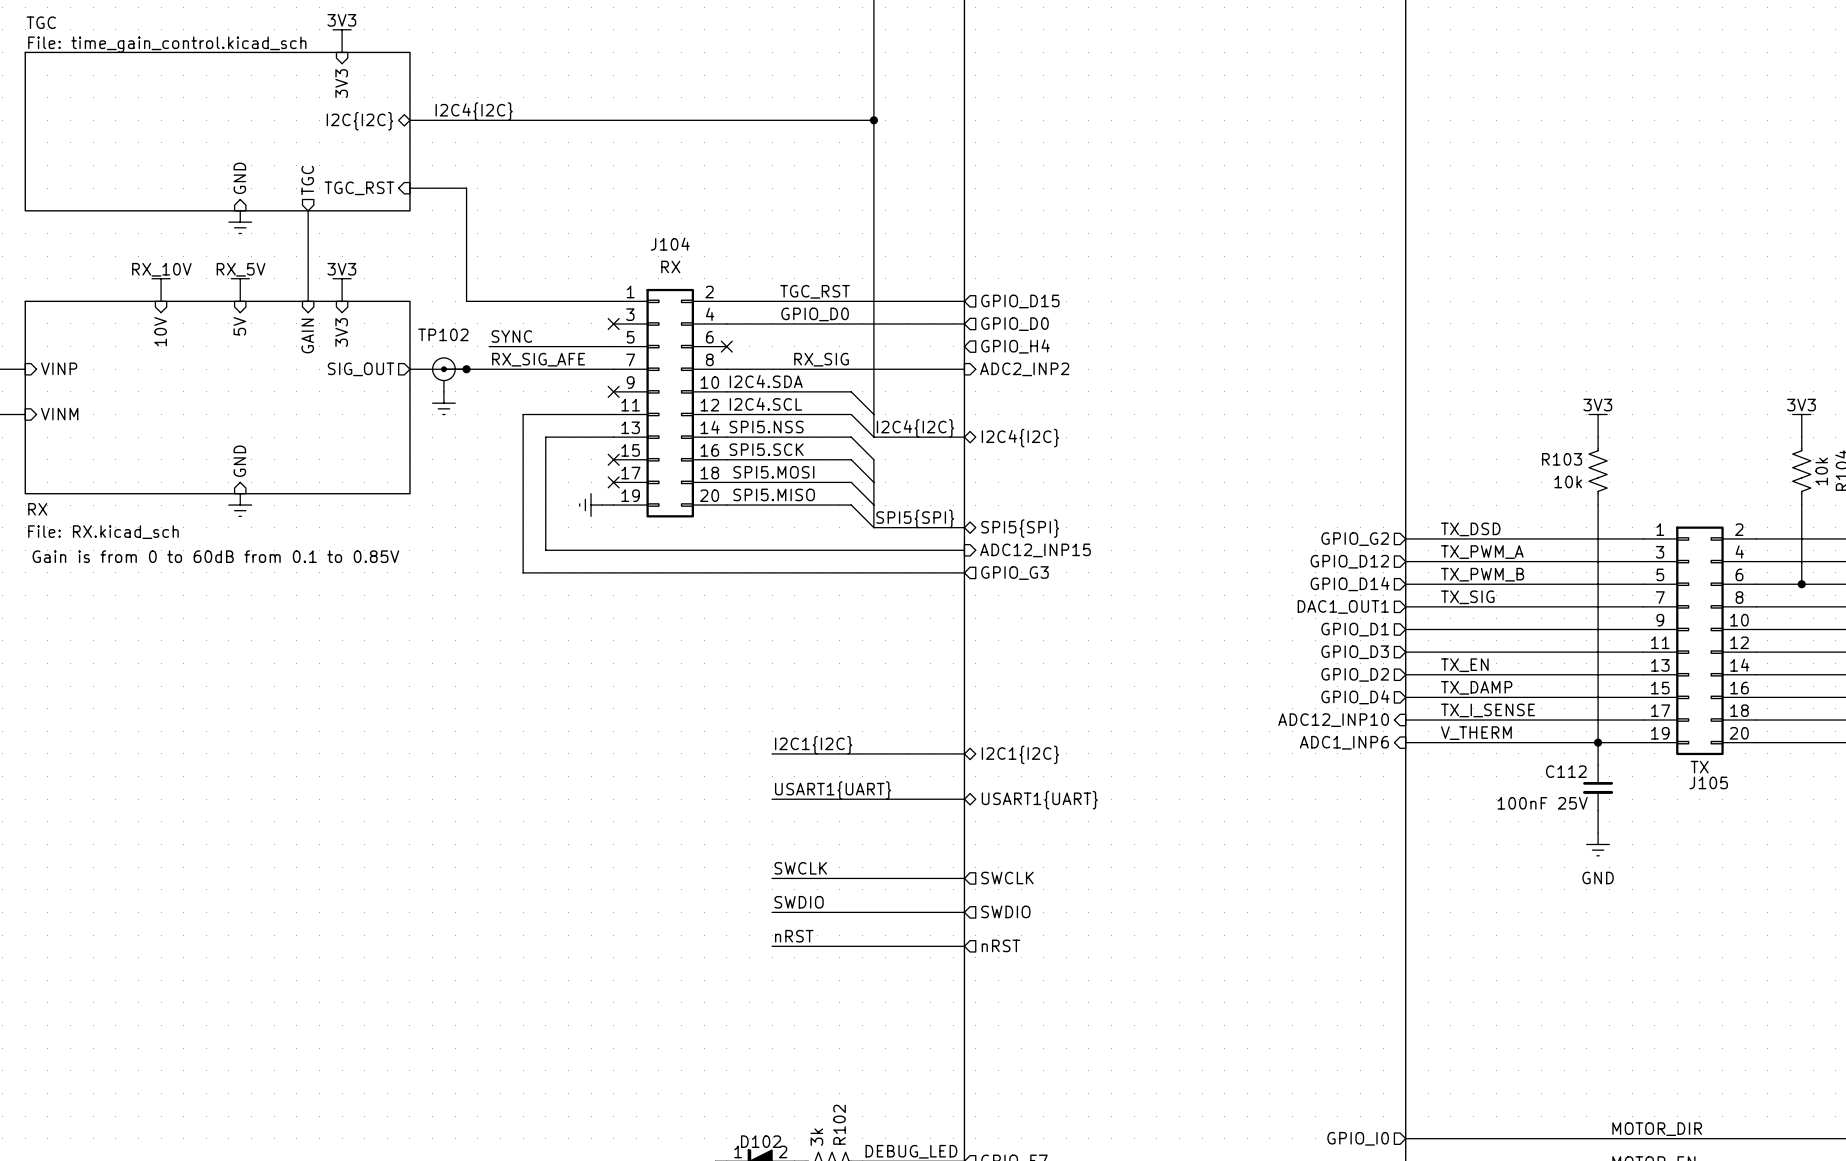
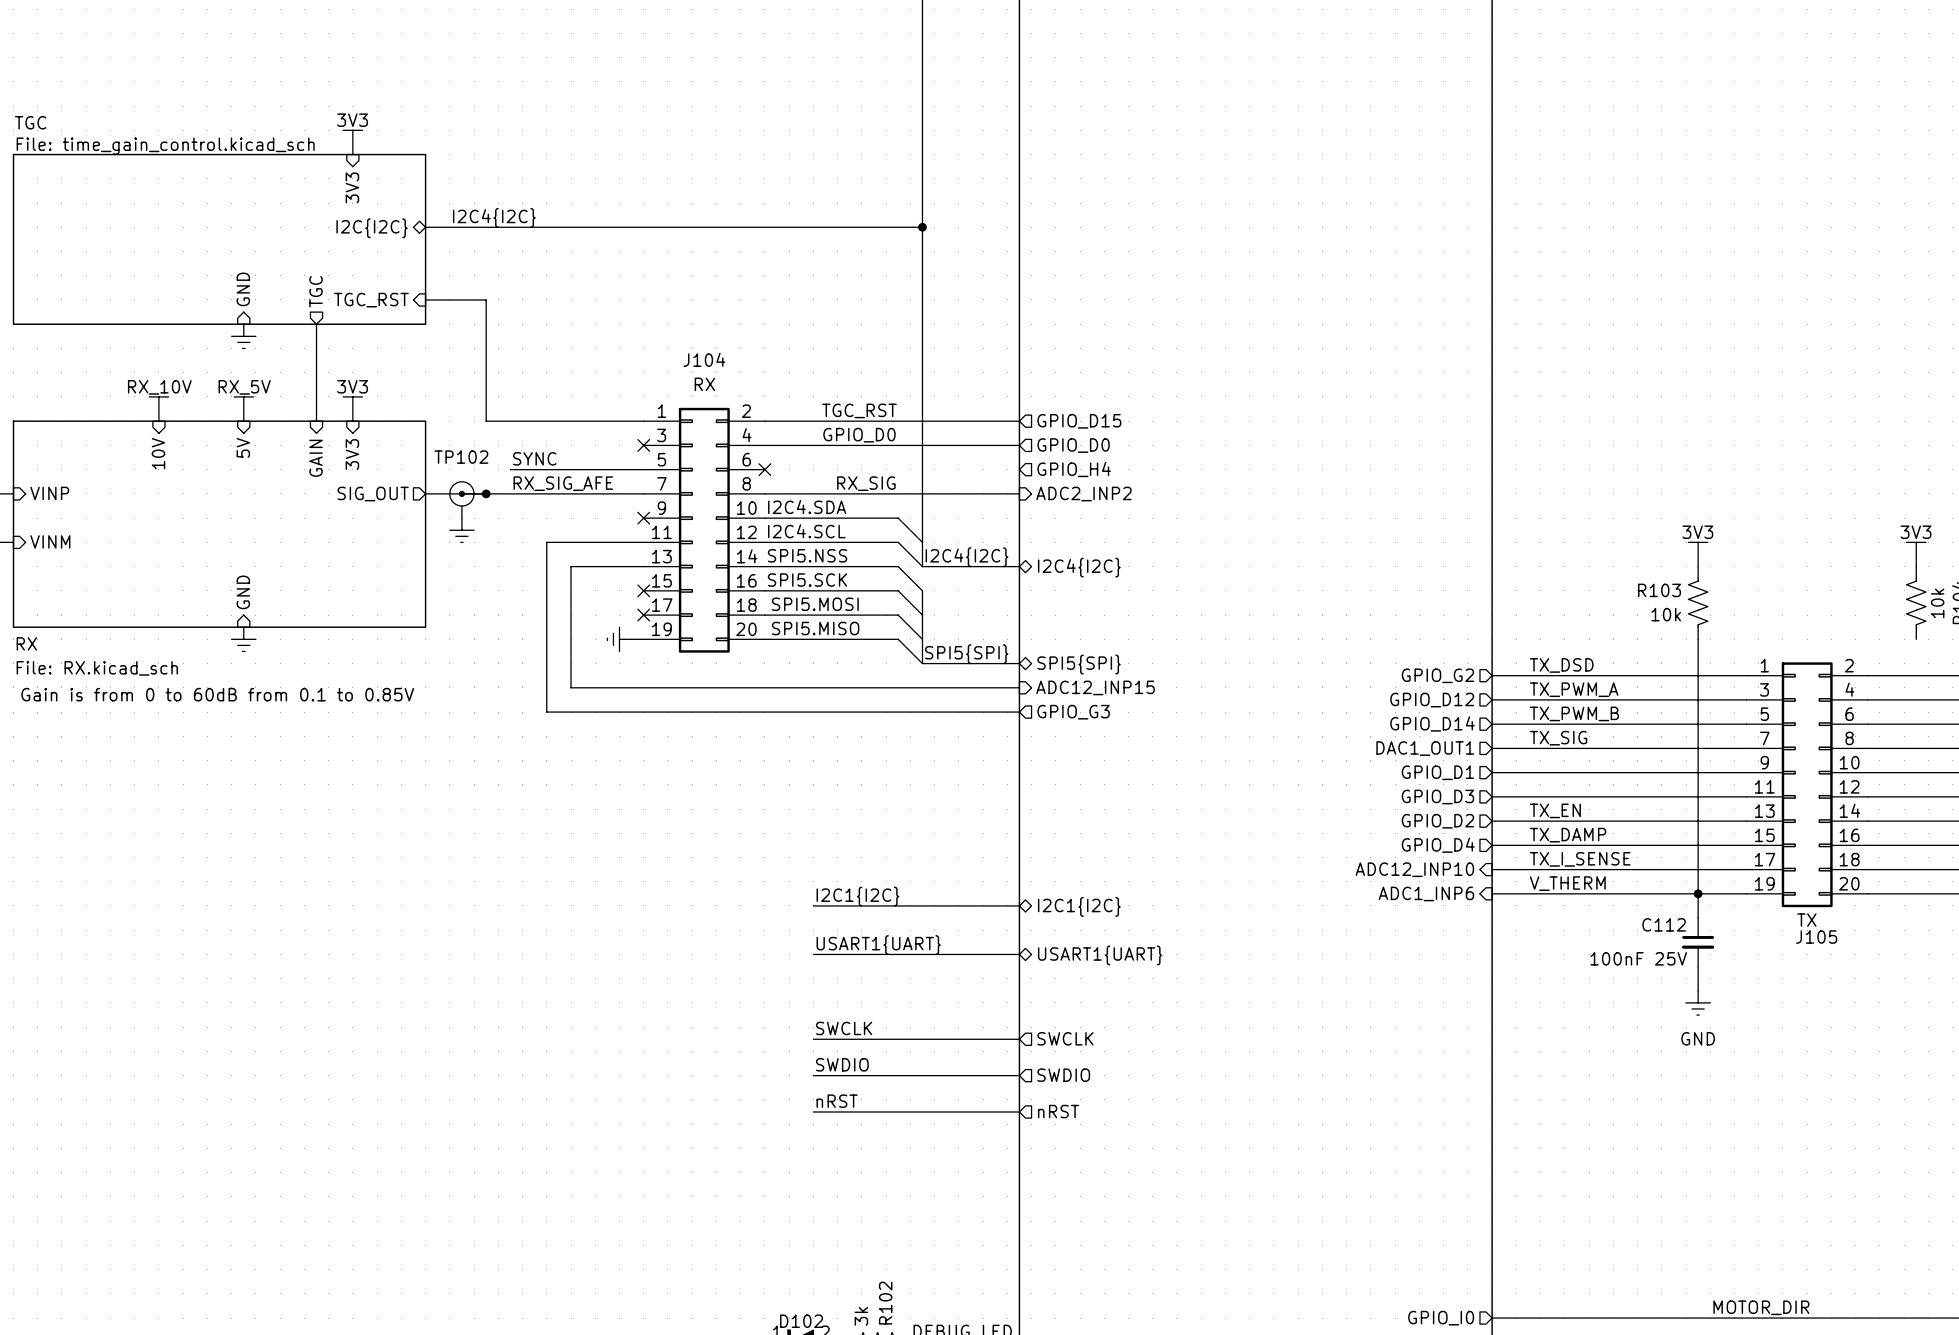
wire: (1801, 505) (1801, 584) -> none
junction: (1801, 584) -> none

